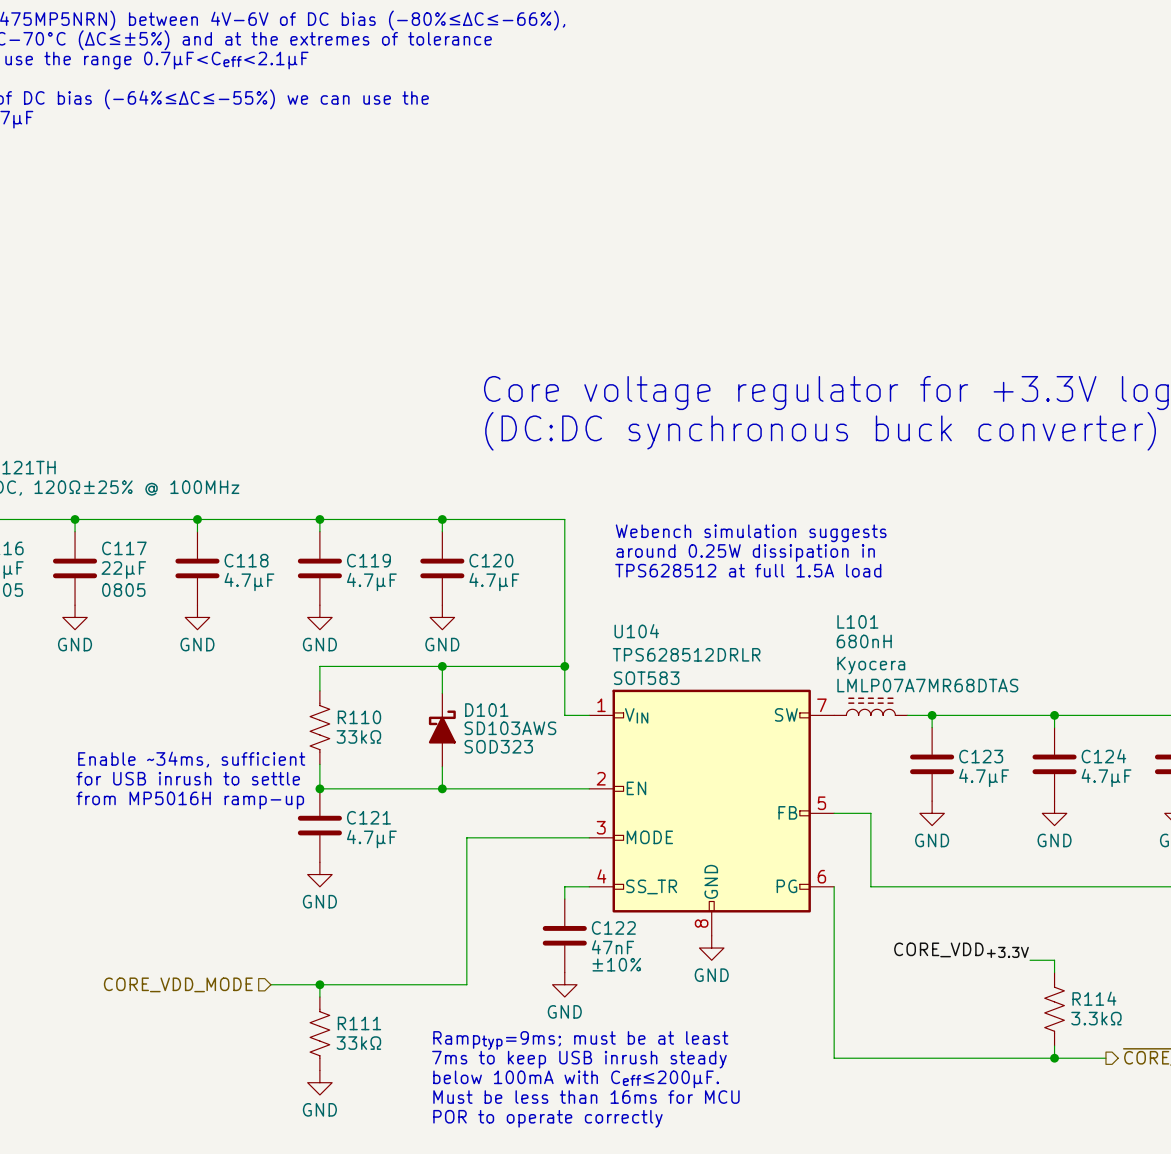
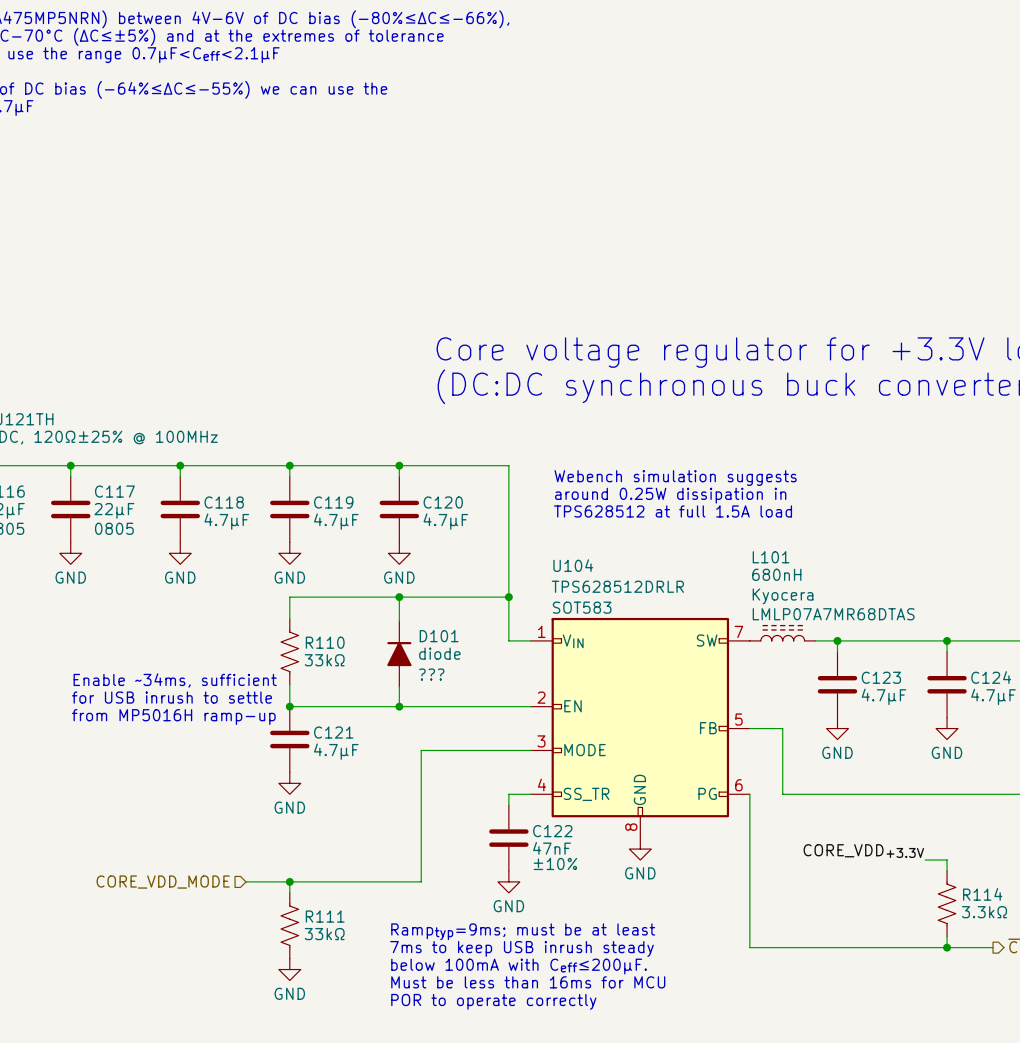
D101 symbol: [428, 693, 456, 767] -> [387, 621, 412, 687]
D101 value: SD103AWS (510, 728) -> diode (439, 653)
D101 text: SOD323 (498, 746) -> ??? (431, 674)

